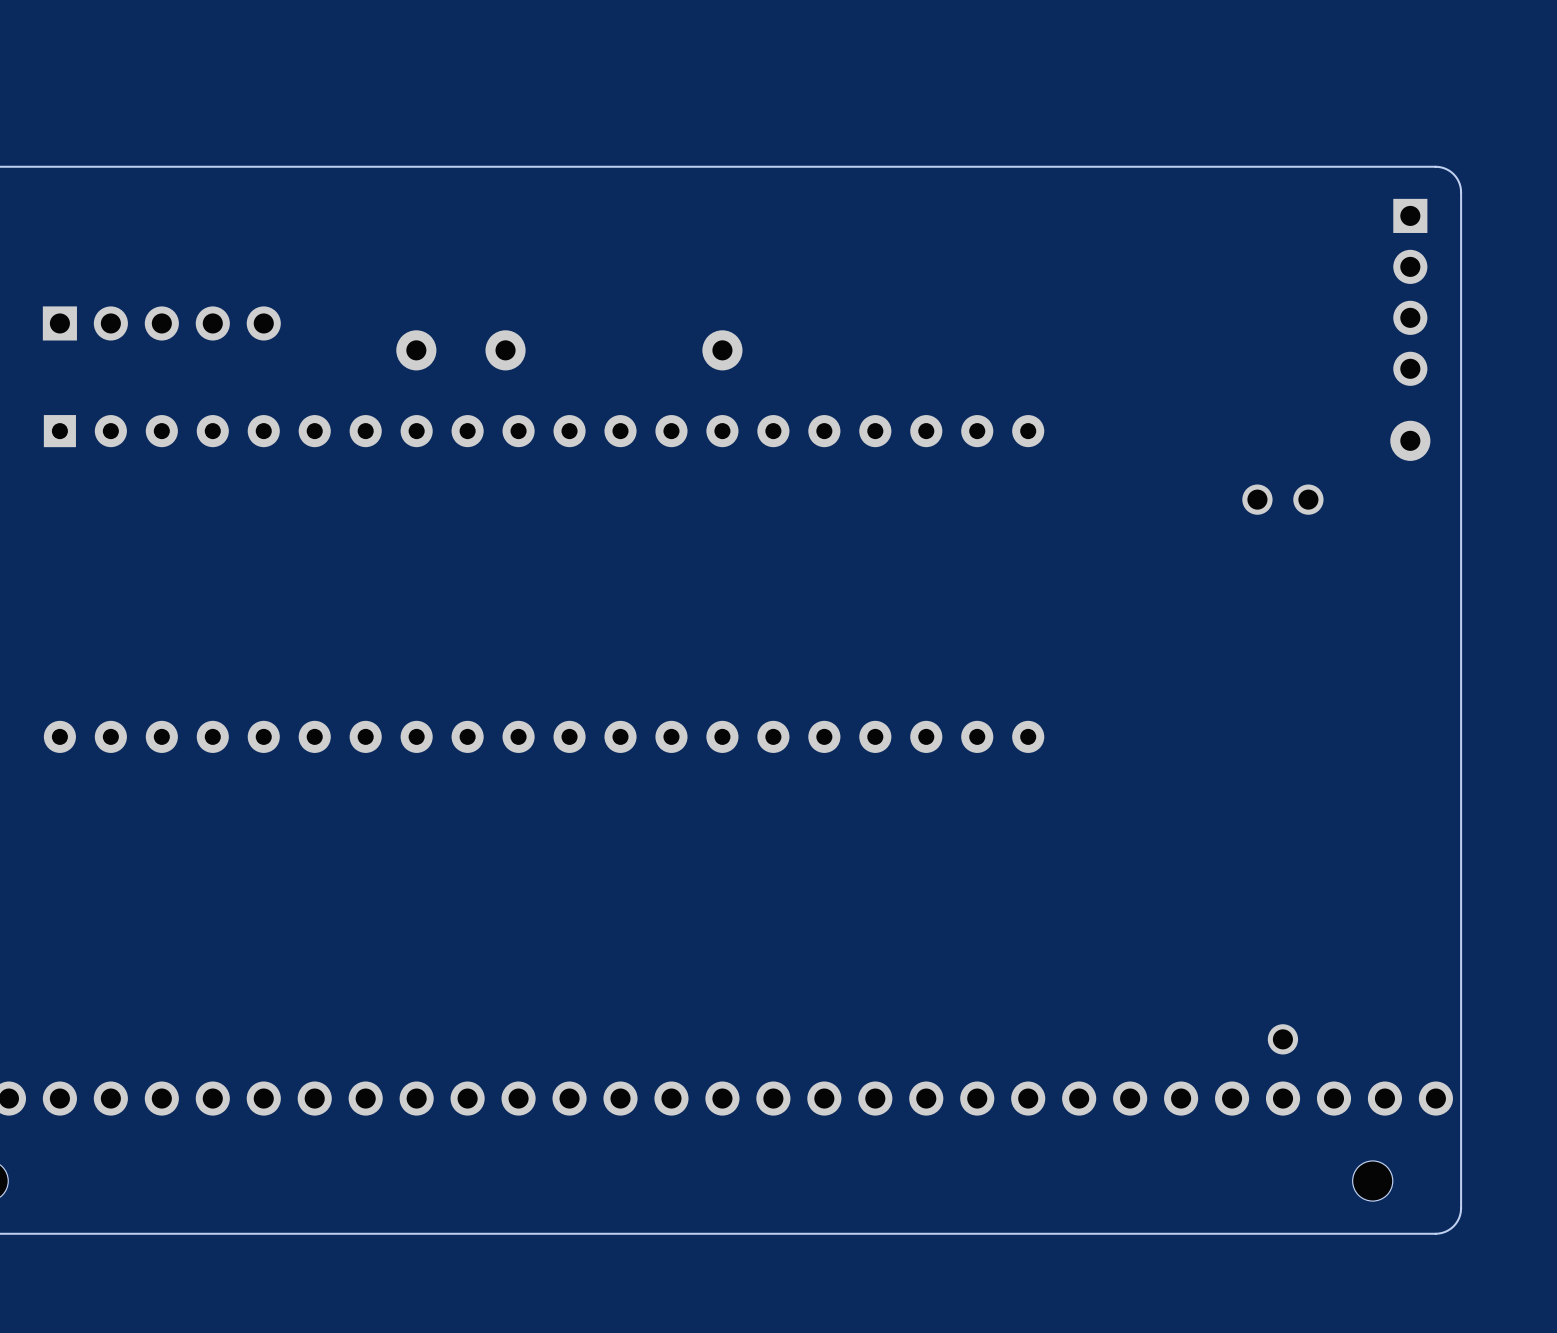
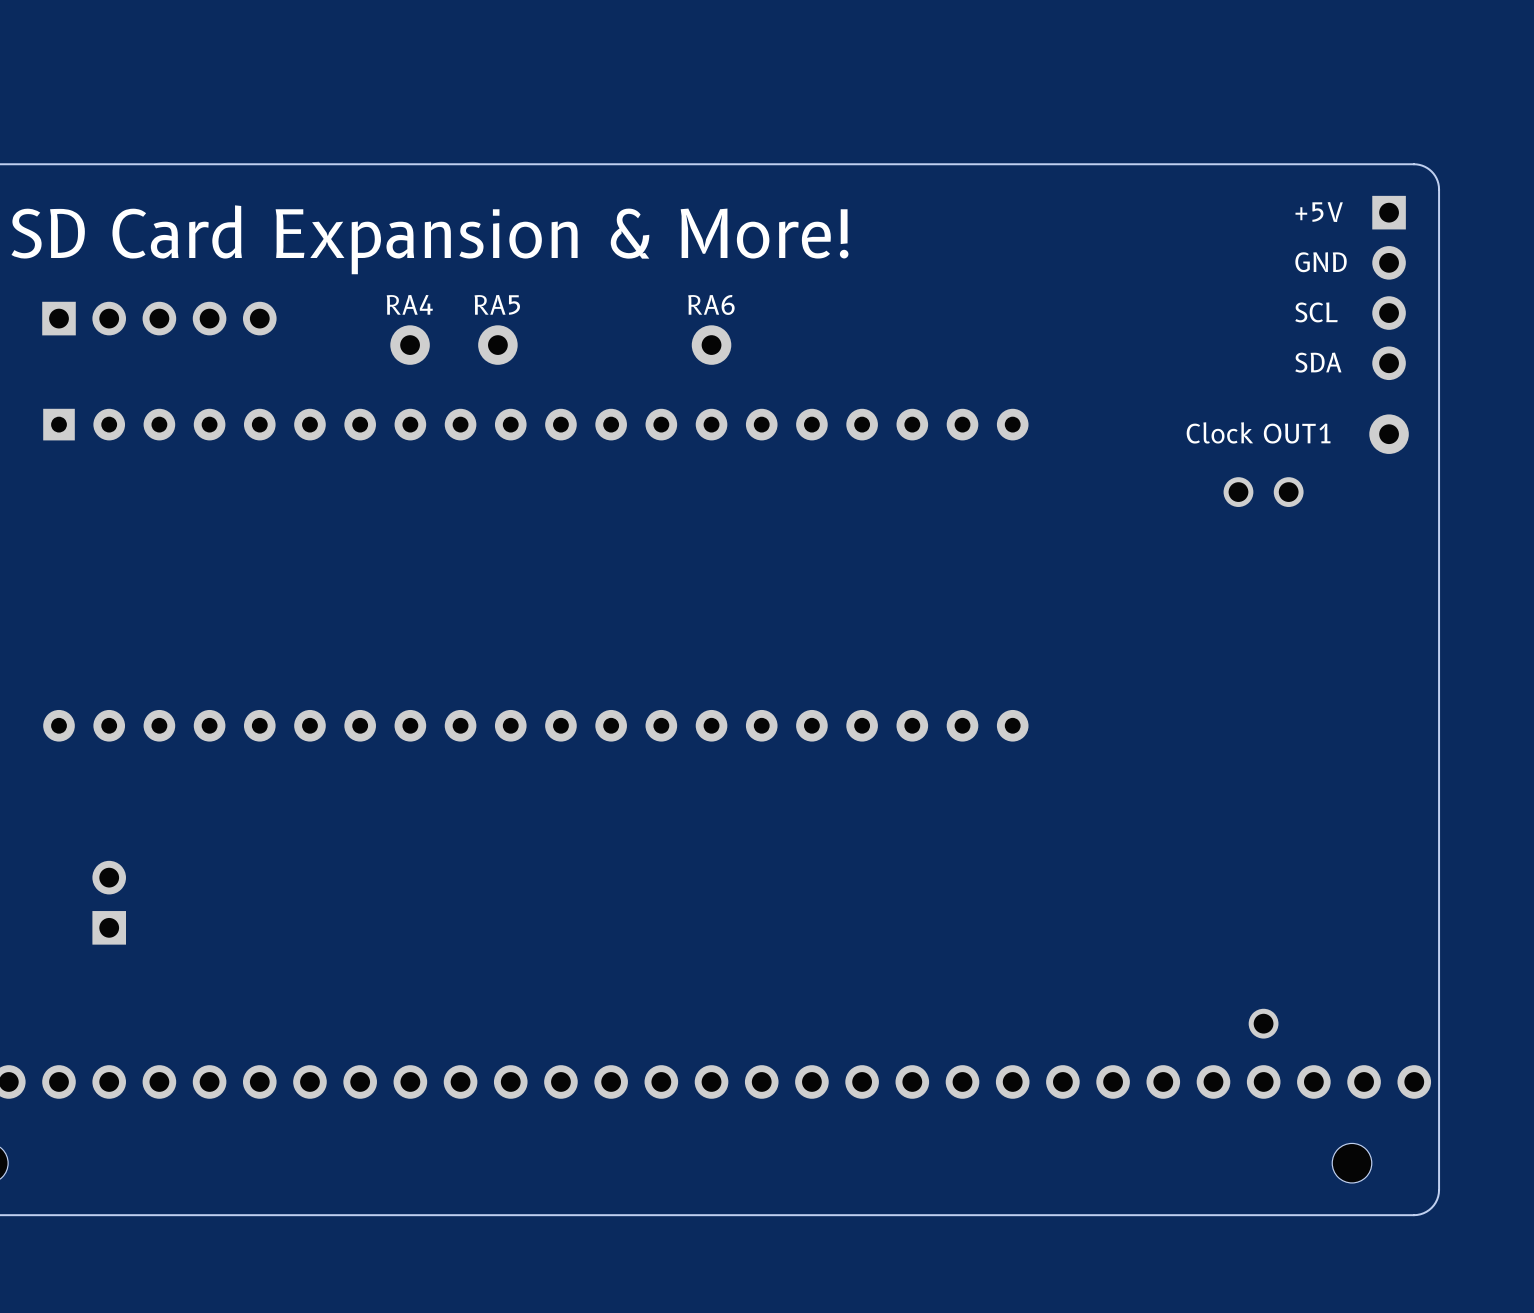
text: none -> +5V (1319, 212)
text: none -> SD Card Expansion & More! (429, 239)
text: none -> GND (1321, 262)
RA4 name: none -> RA4 (409, 304)
RA5 name: none -> RA5 (497, 304)
RA6 name: none -> RA6 (711, 304)
text: none -> SCL (1316, 312)
text: none -> SDA (1318, 362)
text: none -> Clock OUT1 (1258, 432)
part: none -> (109, 902)

